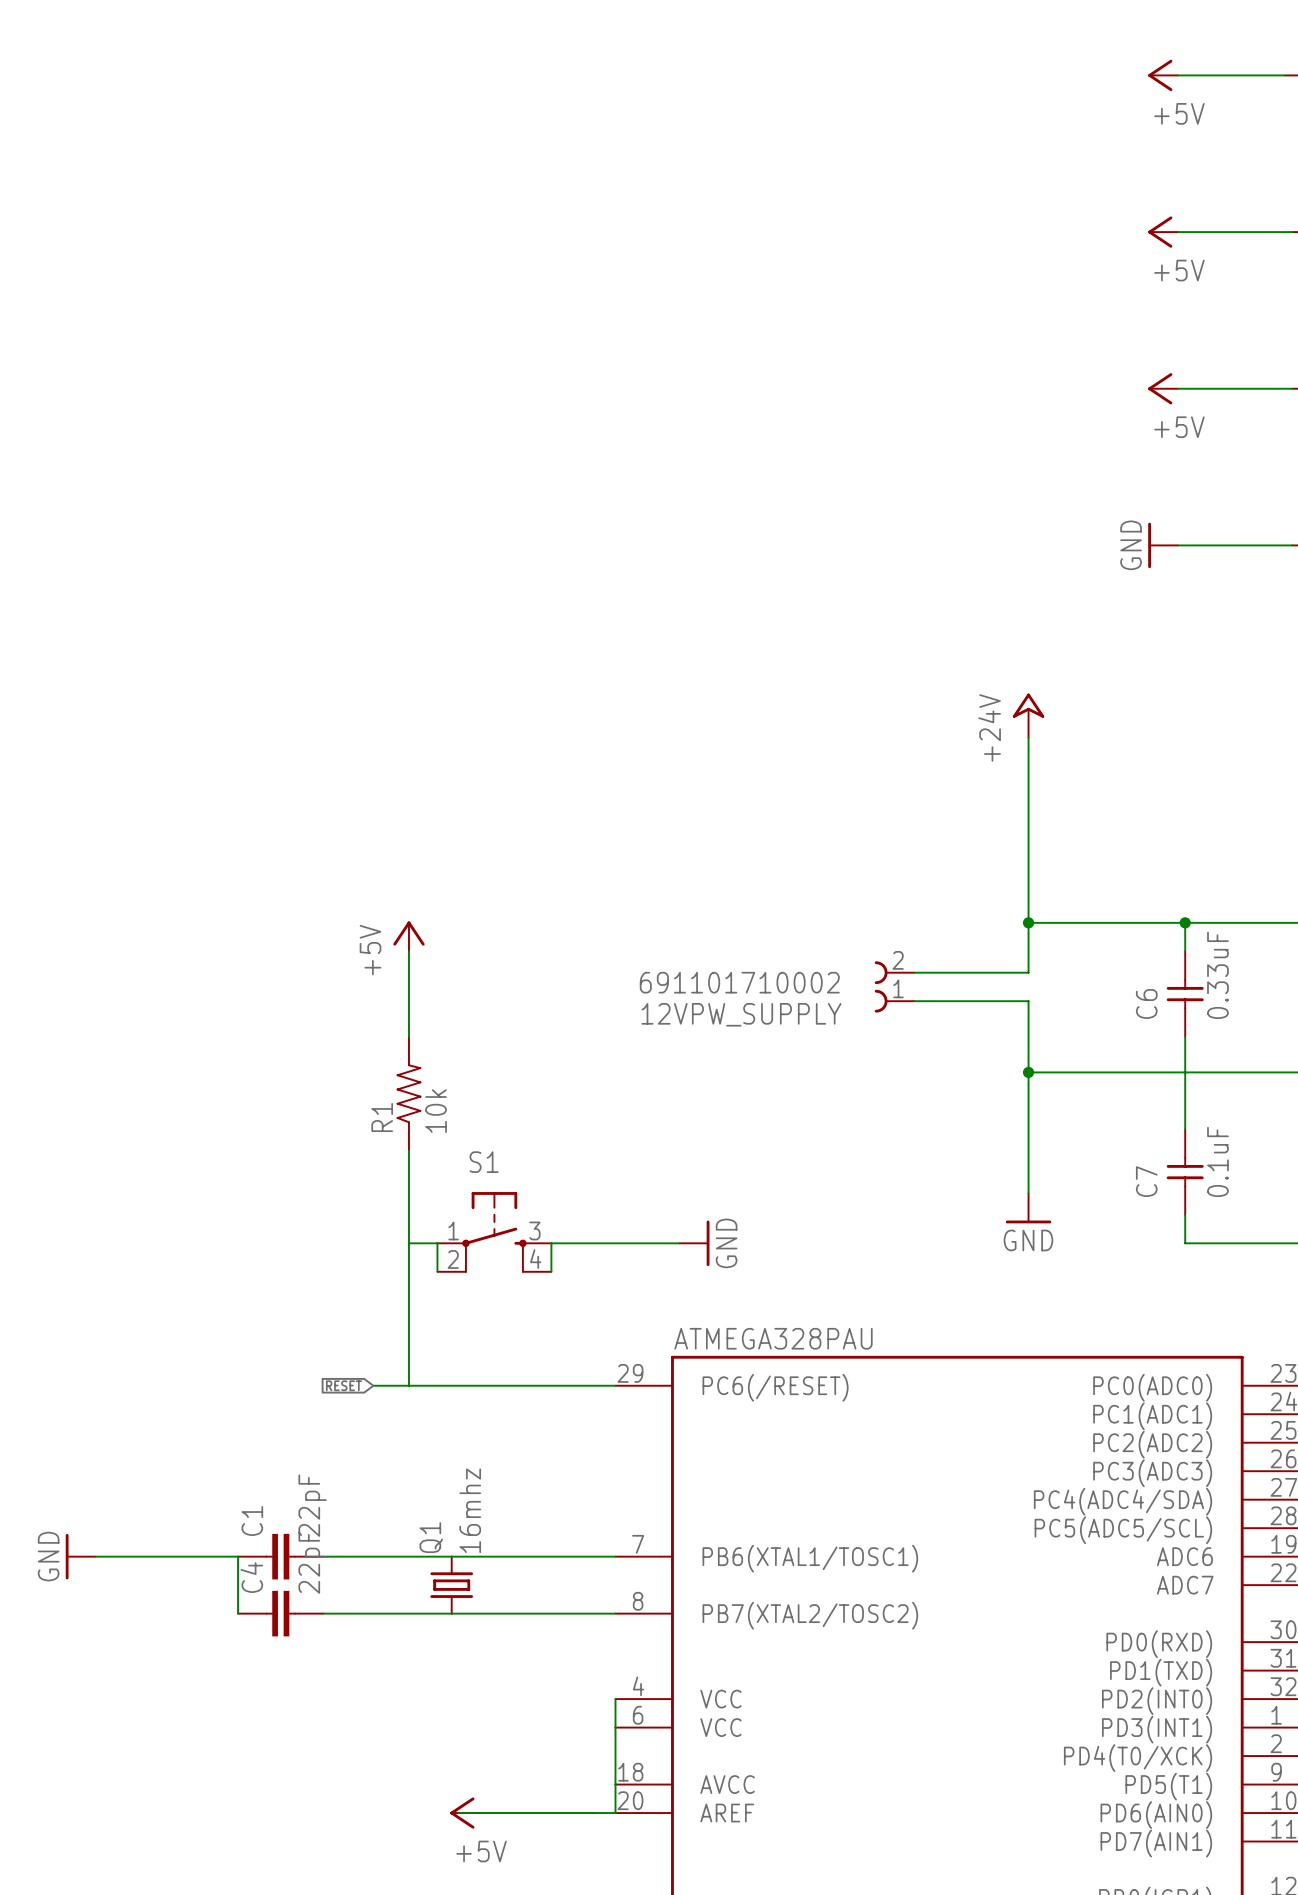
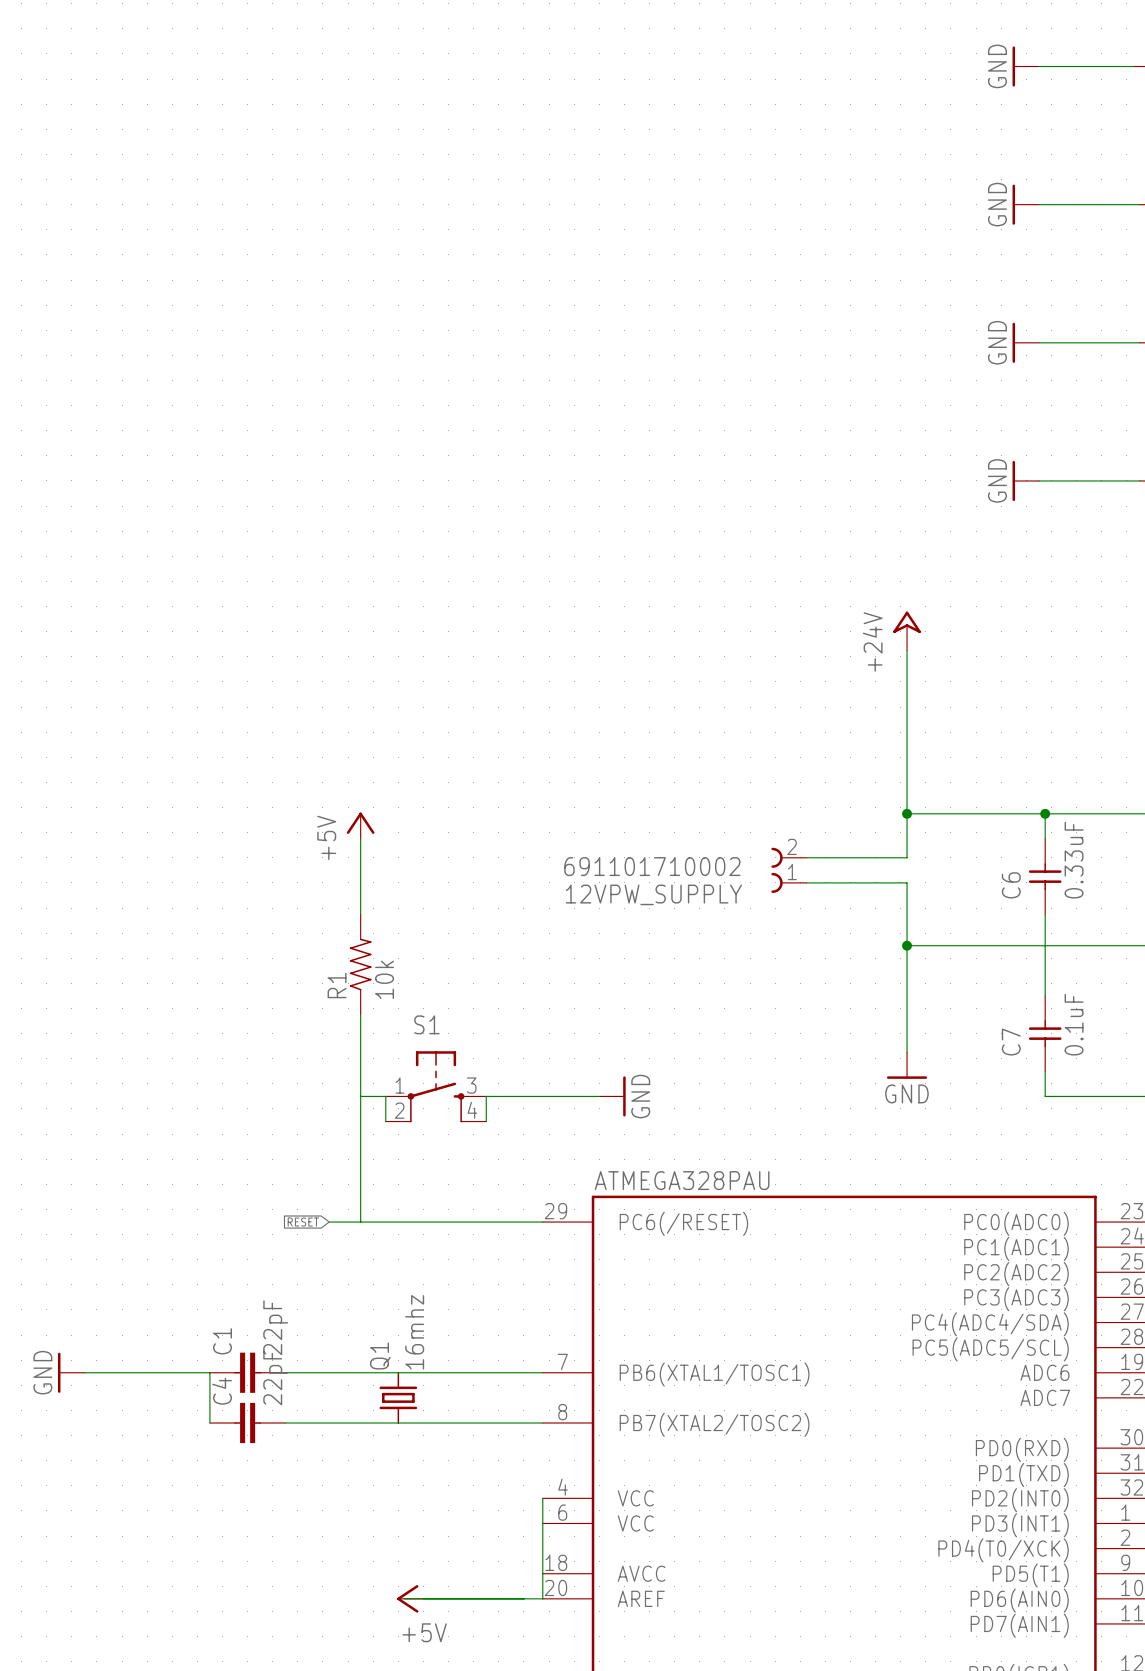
power symbol: +5V (1163, 75) -> GND (1025, 66)
power symbol: +5V (1163, 232) -> GND (1025, 204)
power symbol: +5V (1163, 388) -> GND (1025, 342)

